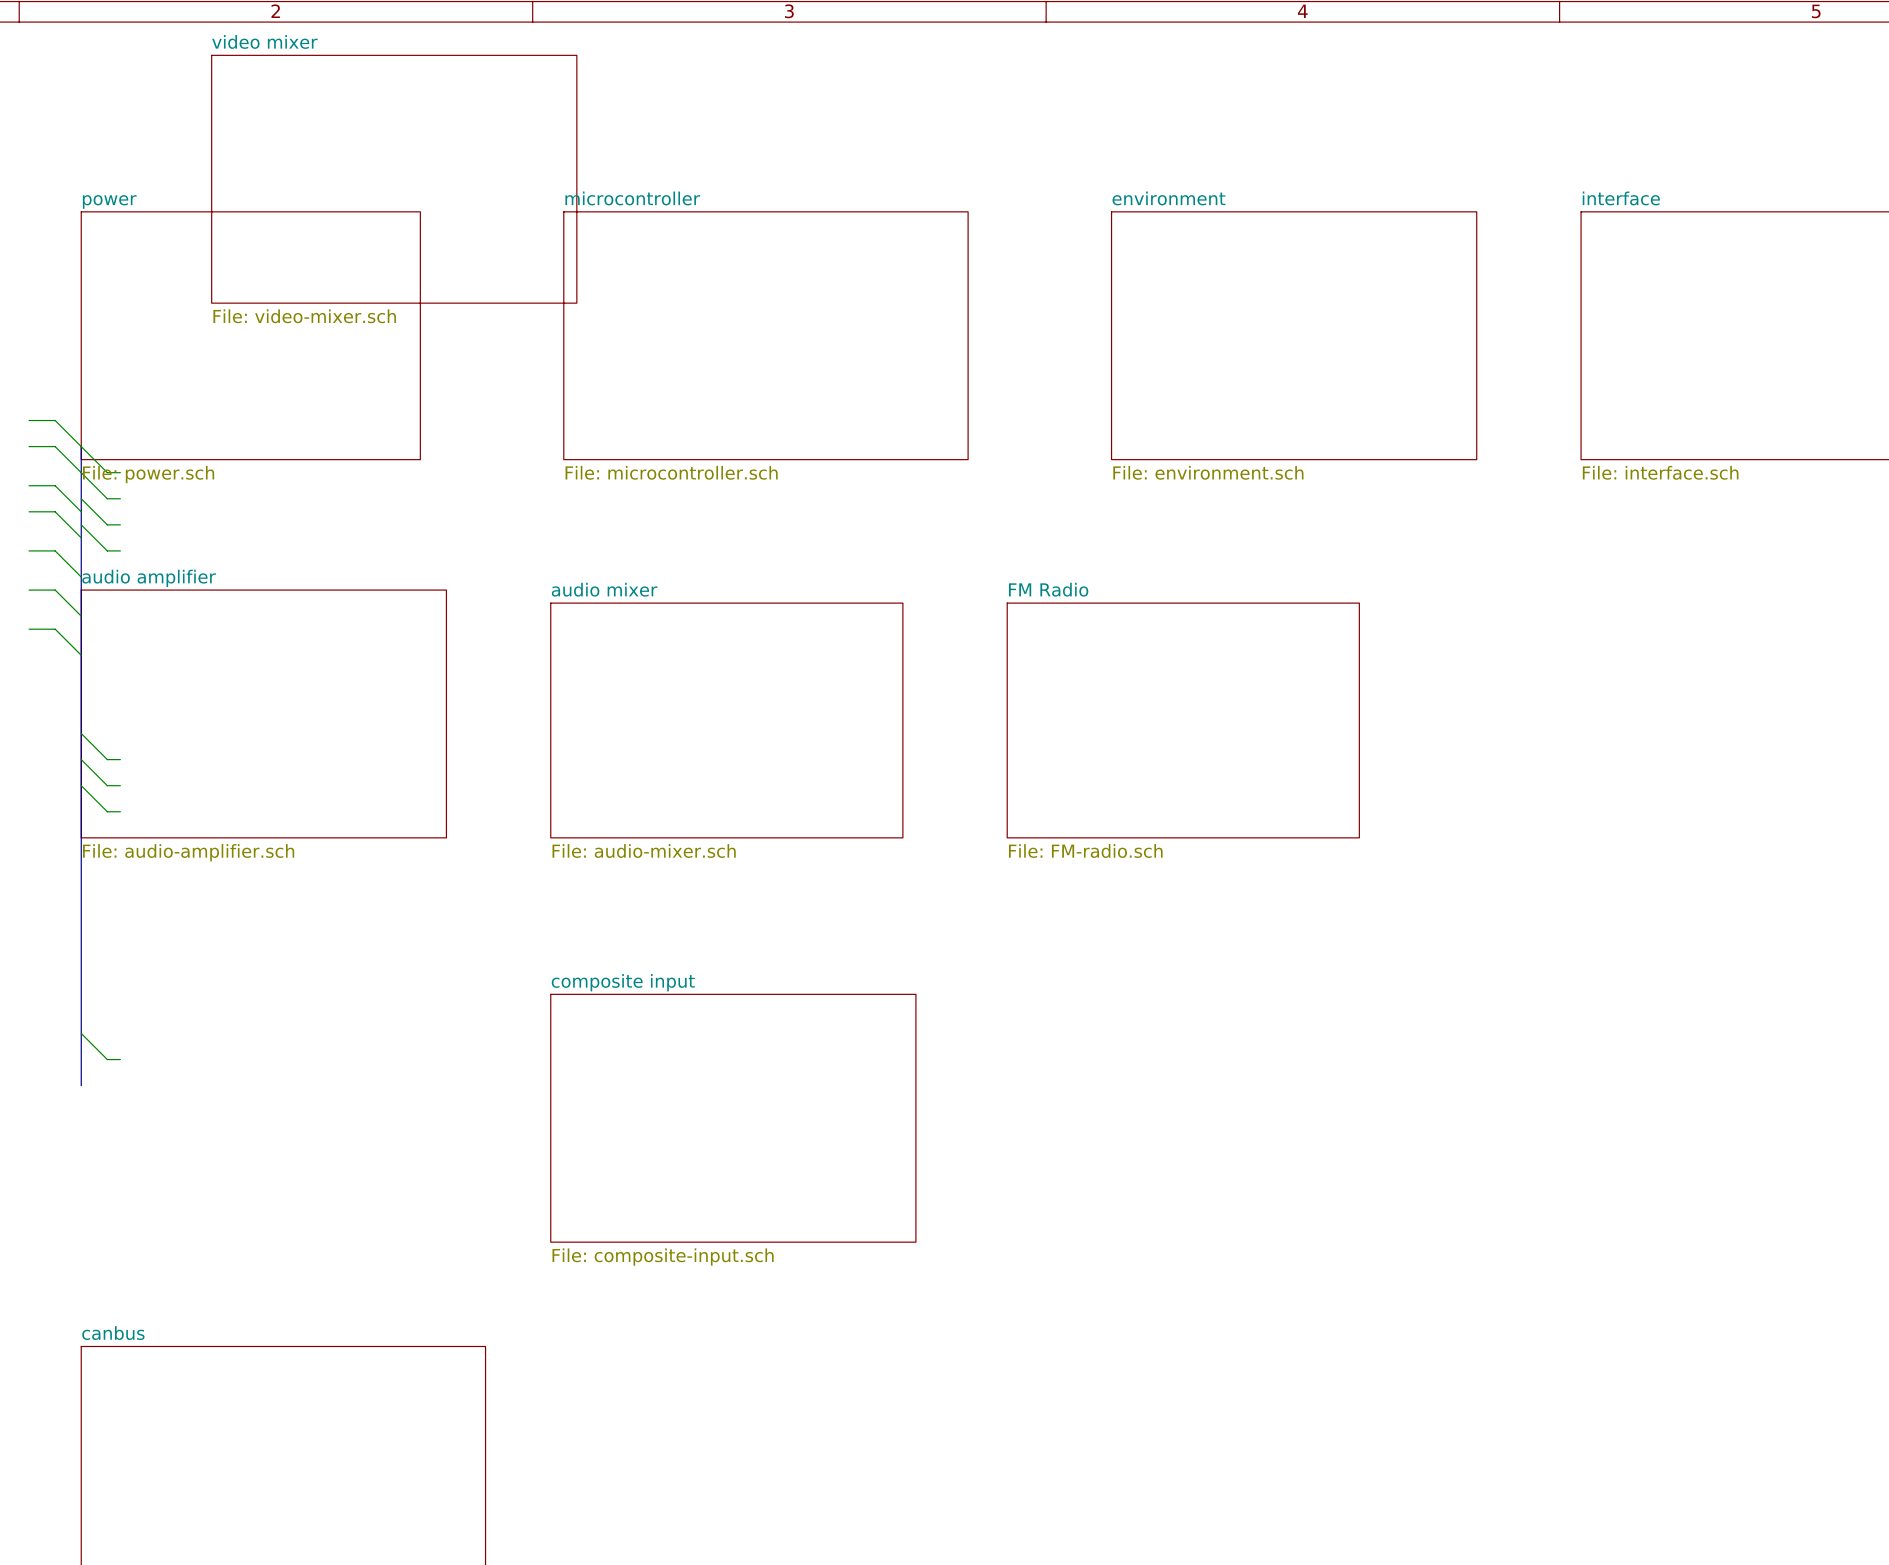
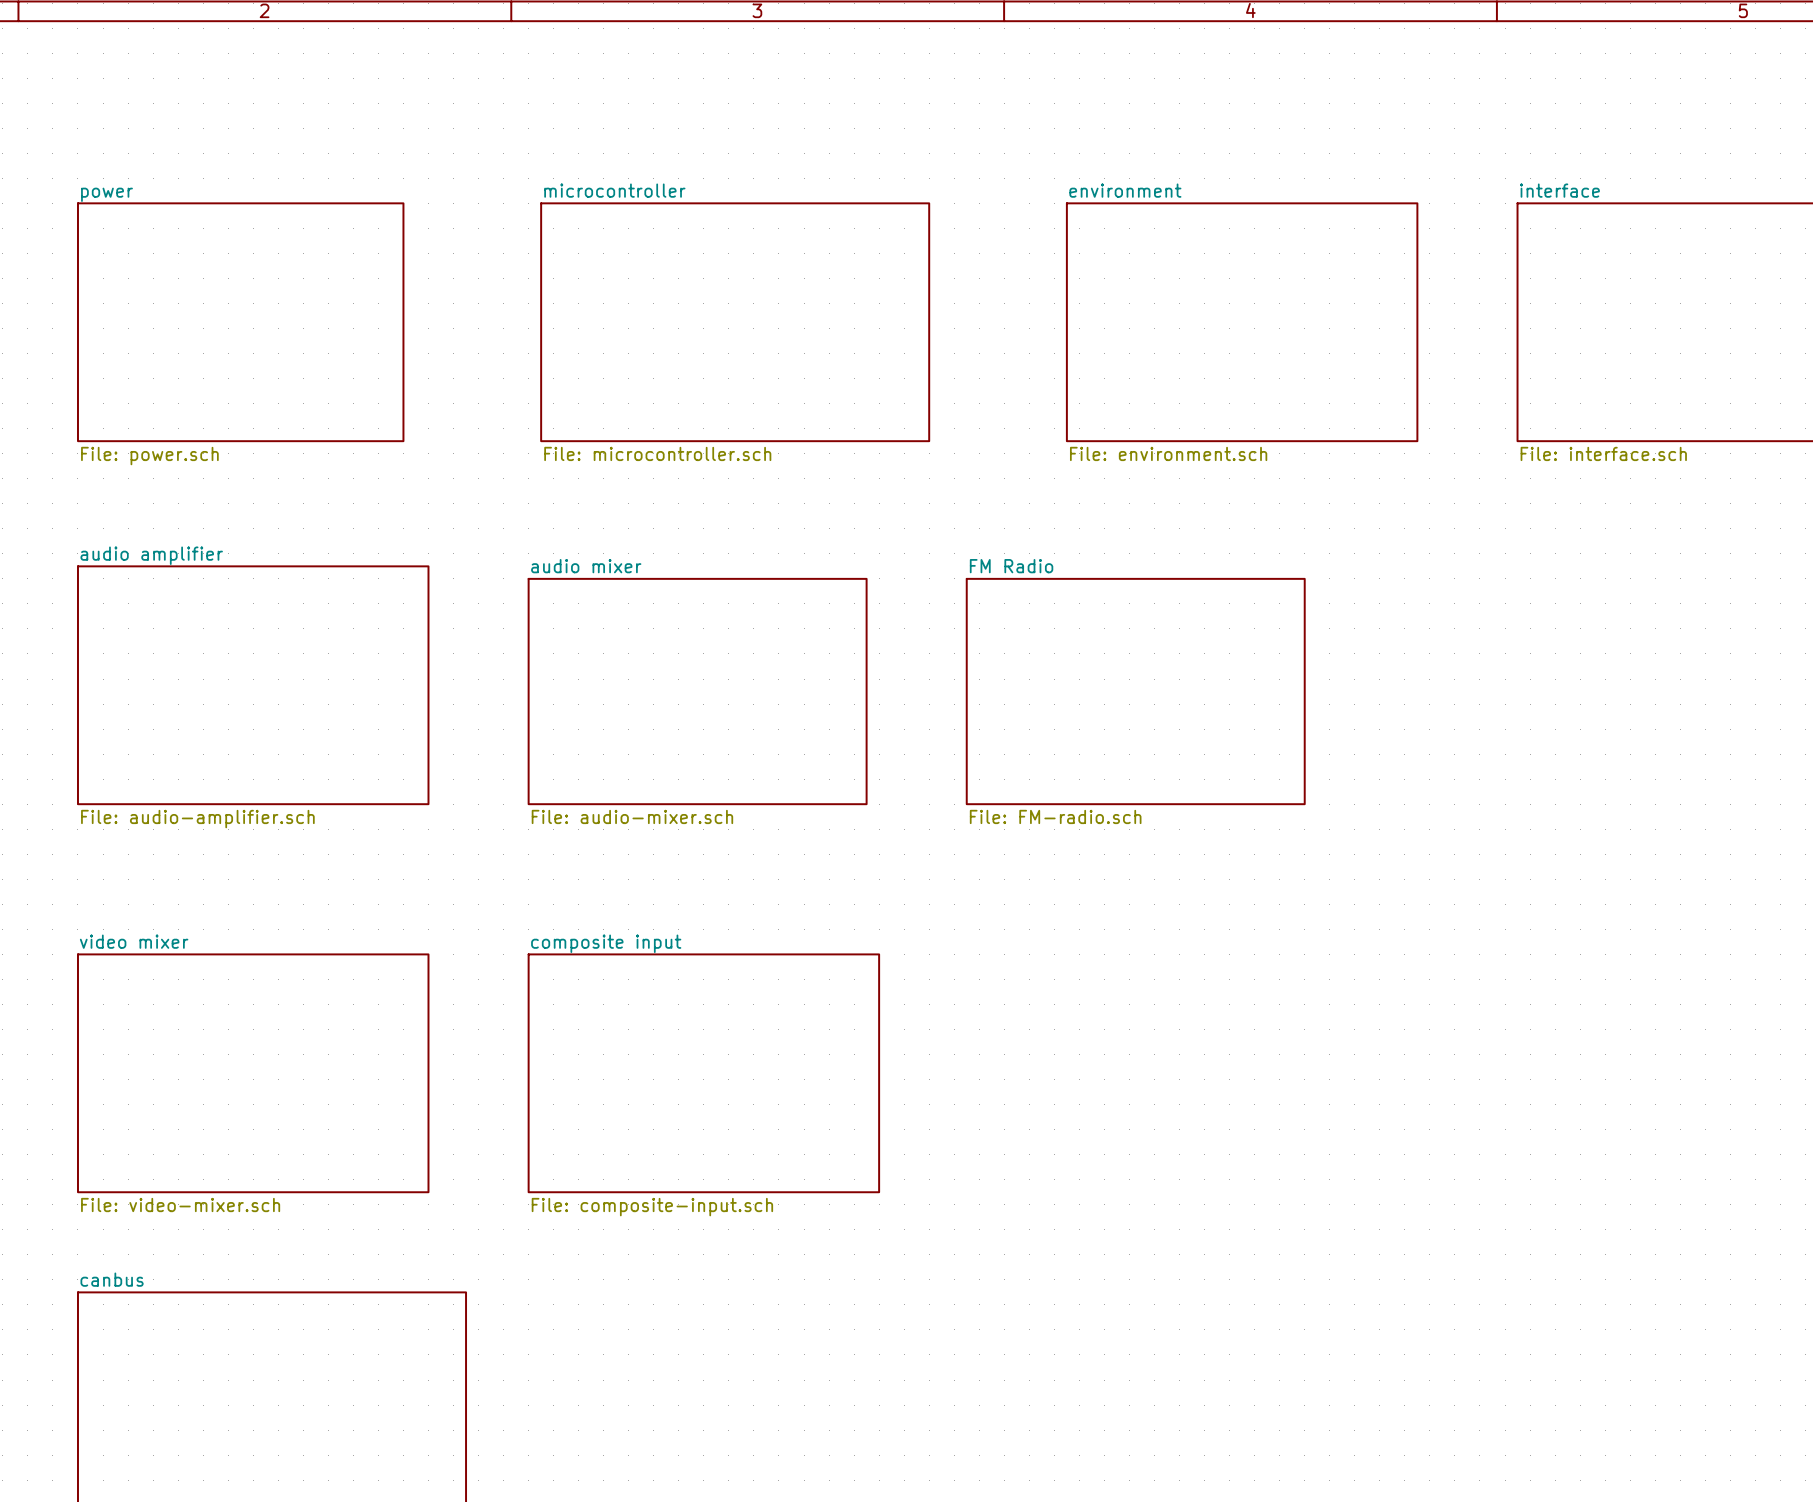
sheet video mixer: File: video-mixer.sch (394, 179) -> none
wire: (29, 420) (55, 420) (107, 472) (120, 472) -> none
wire: (29, 446) (55, 446) (107, 498) (120, 498) -> none
bus: (81, 446) (81, 1085) -> none
wire: (29, 485) (55, 485) (81, 511) -> none
wire: (81, 498) (107, 524) (120, 524) -> none
wire: (29, 511) (55, 511) (81, 537) -> none
wire: (81, 524) (107, 550) (120, 550) -> none
wire: (29, 550) (55, 550) (81, 577) -> none
wire: (29, 590) (55, 590) (81, 616) -> none
wire: (29, 629) (55, 629) (81, 655) -> none
wire: (81, 733) (107, 759) (120, 759) -> none
wire: (81, 759) (107, 785) (120, 785) -> none
wire: (81, 785) (107, 811) (120, 811) -> none
wire: (81, 1033) (107, 1059) (120, 1059) -> none
sheet video mixer: none -> File: video-mixer.sch (253, 1073)

